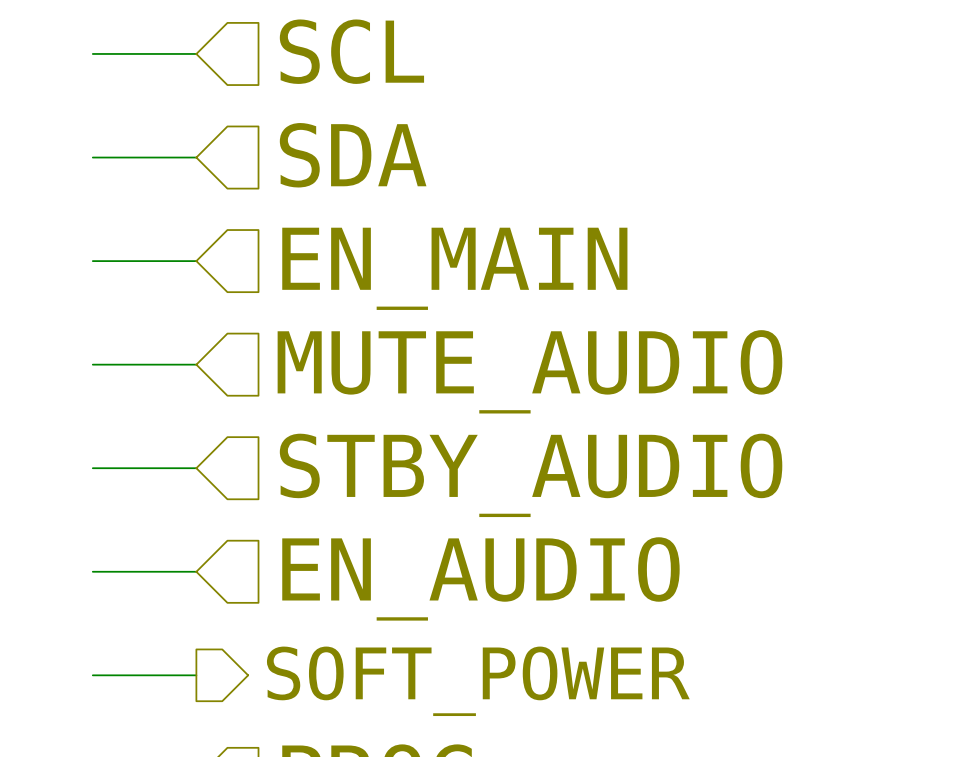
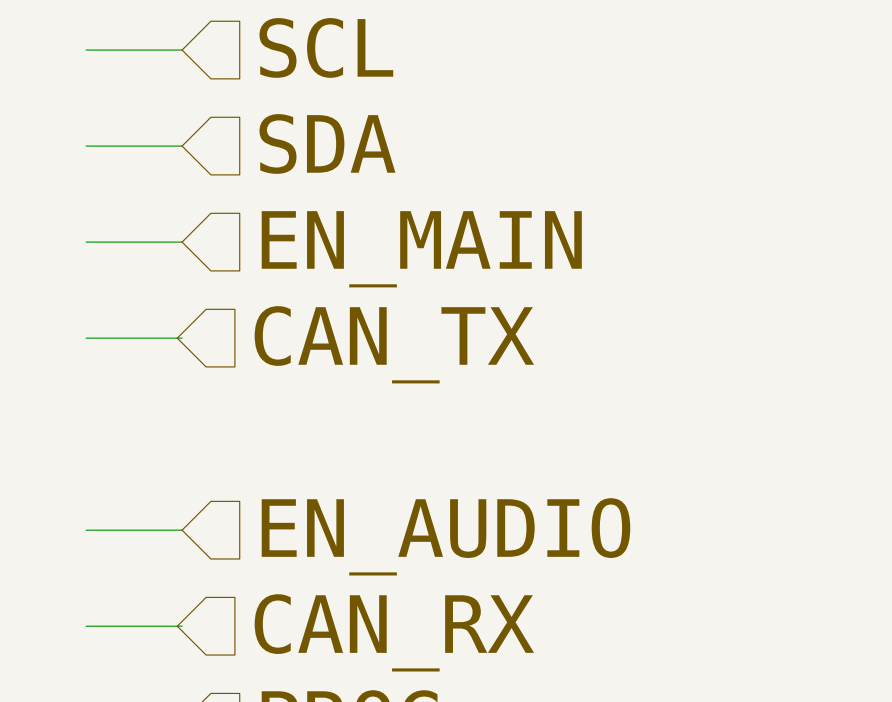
hierarchical label: MUTE_AUDIO (529, 371) -> CAN_TX (394, 344)
wire: (92, 468) (196, 468) -> none
hierarchical label: STBY_AUDIO (531, 475) -> none
hierarchical label shape: output (478, 681) -> input (394, 632)
hierarchical label: SOFT_POWER (478, 681) -> CAN_RX (394, 632)

